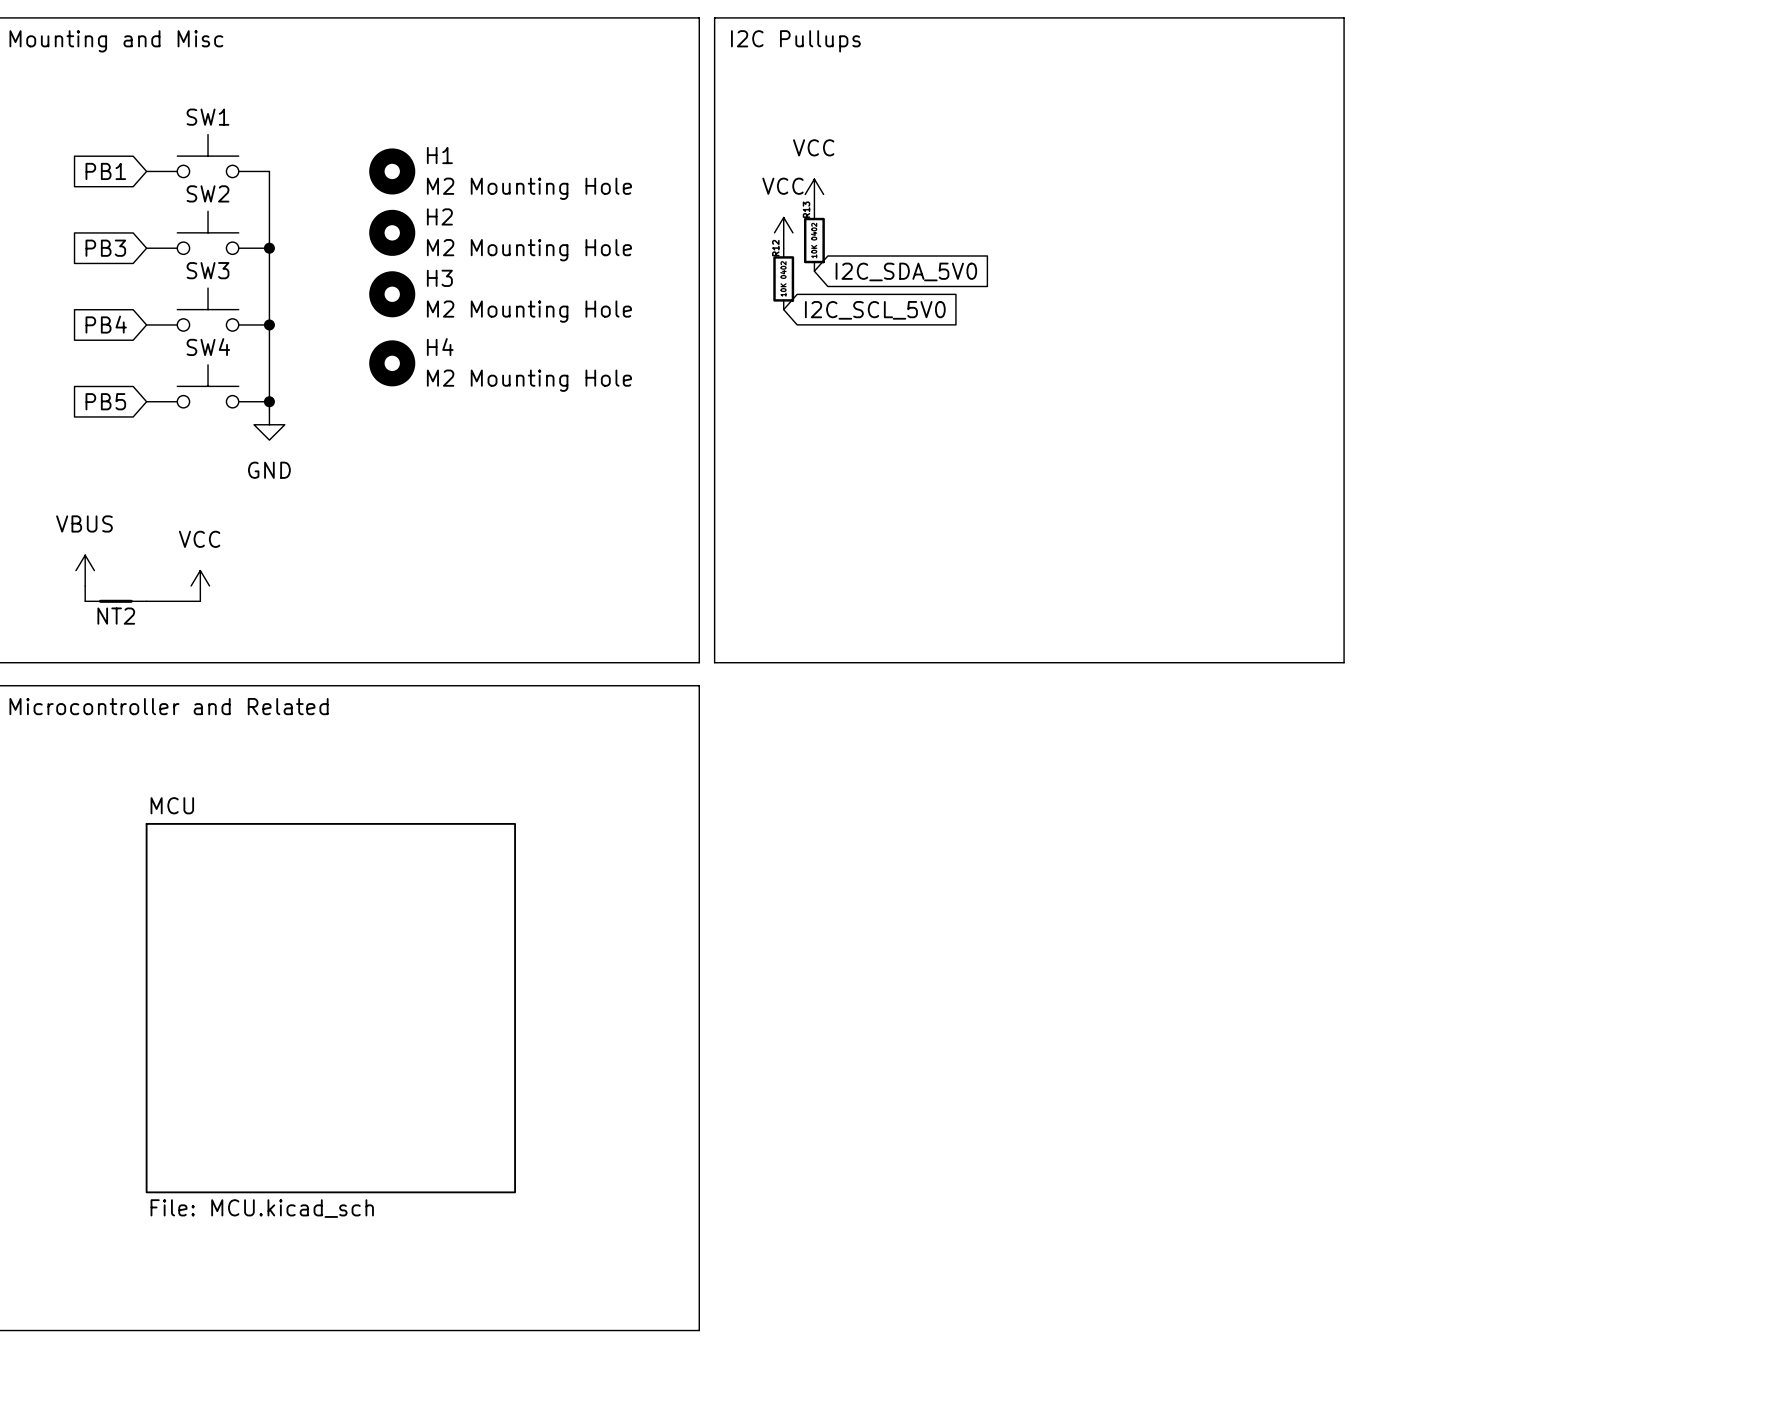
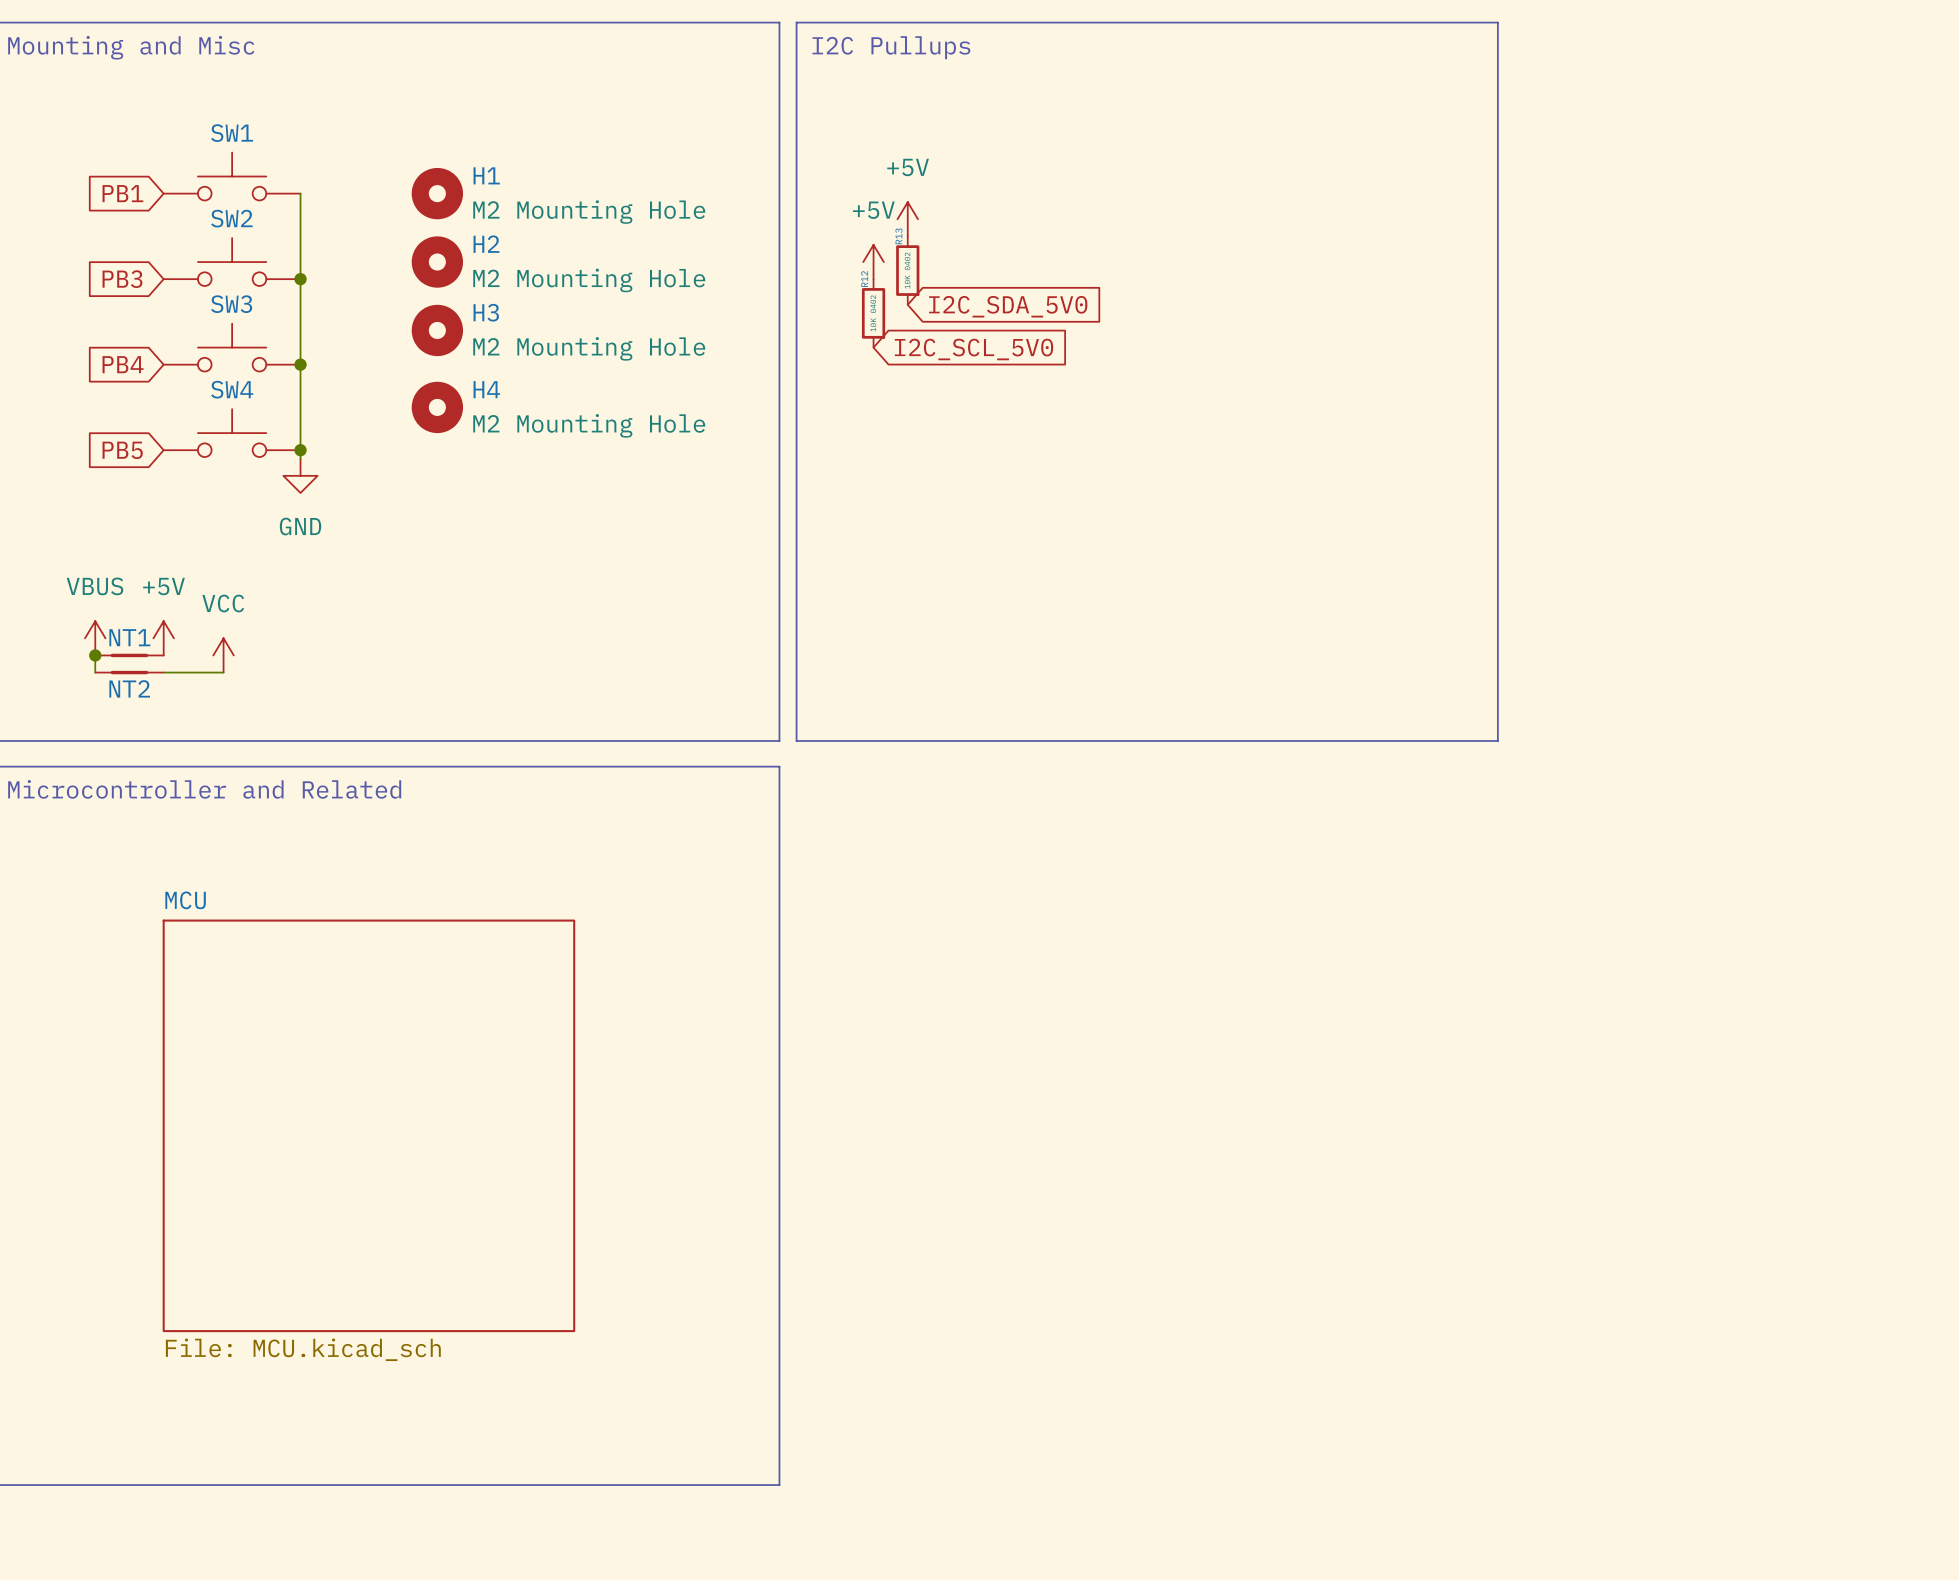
power symbol: VCC (814, 194) -> +5V (907, 219)
power symbol: VCC (783, 232) -> +5V (873, 262)
power symbol: none -> +5V (163, 638)
junction: none -> (95, 655)
NT1: none -> (129, 655)

